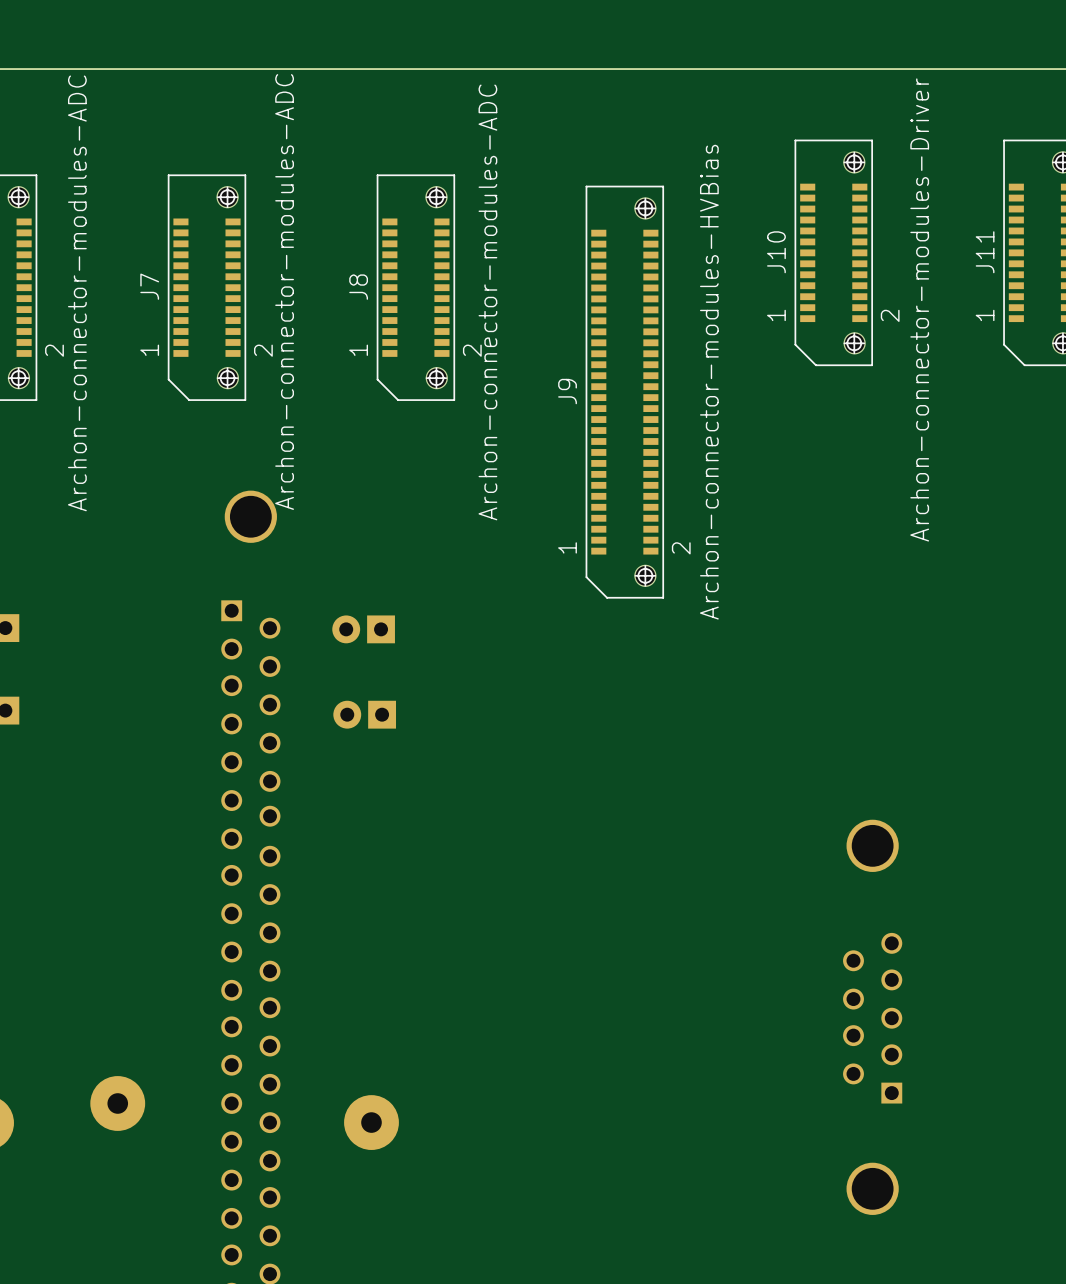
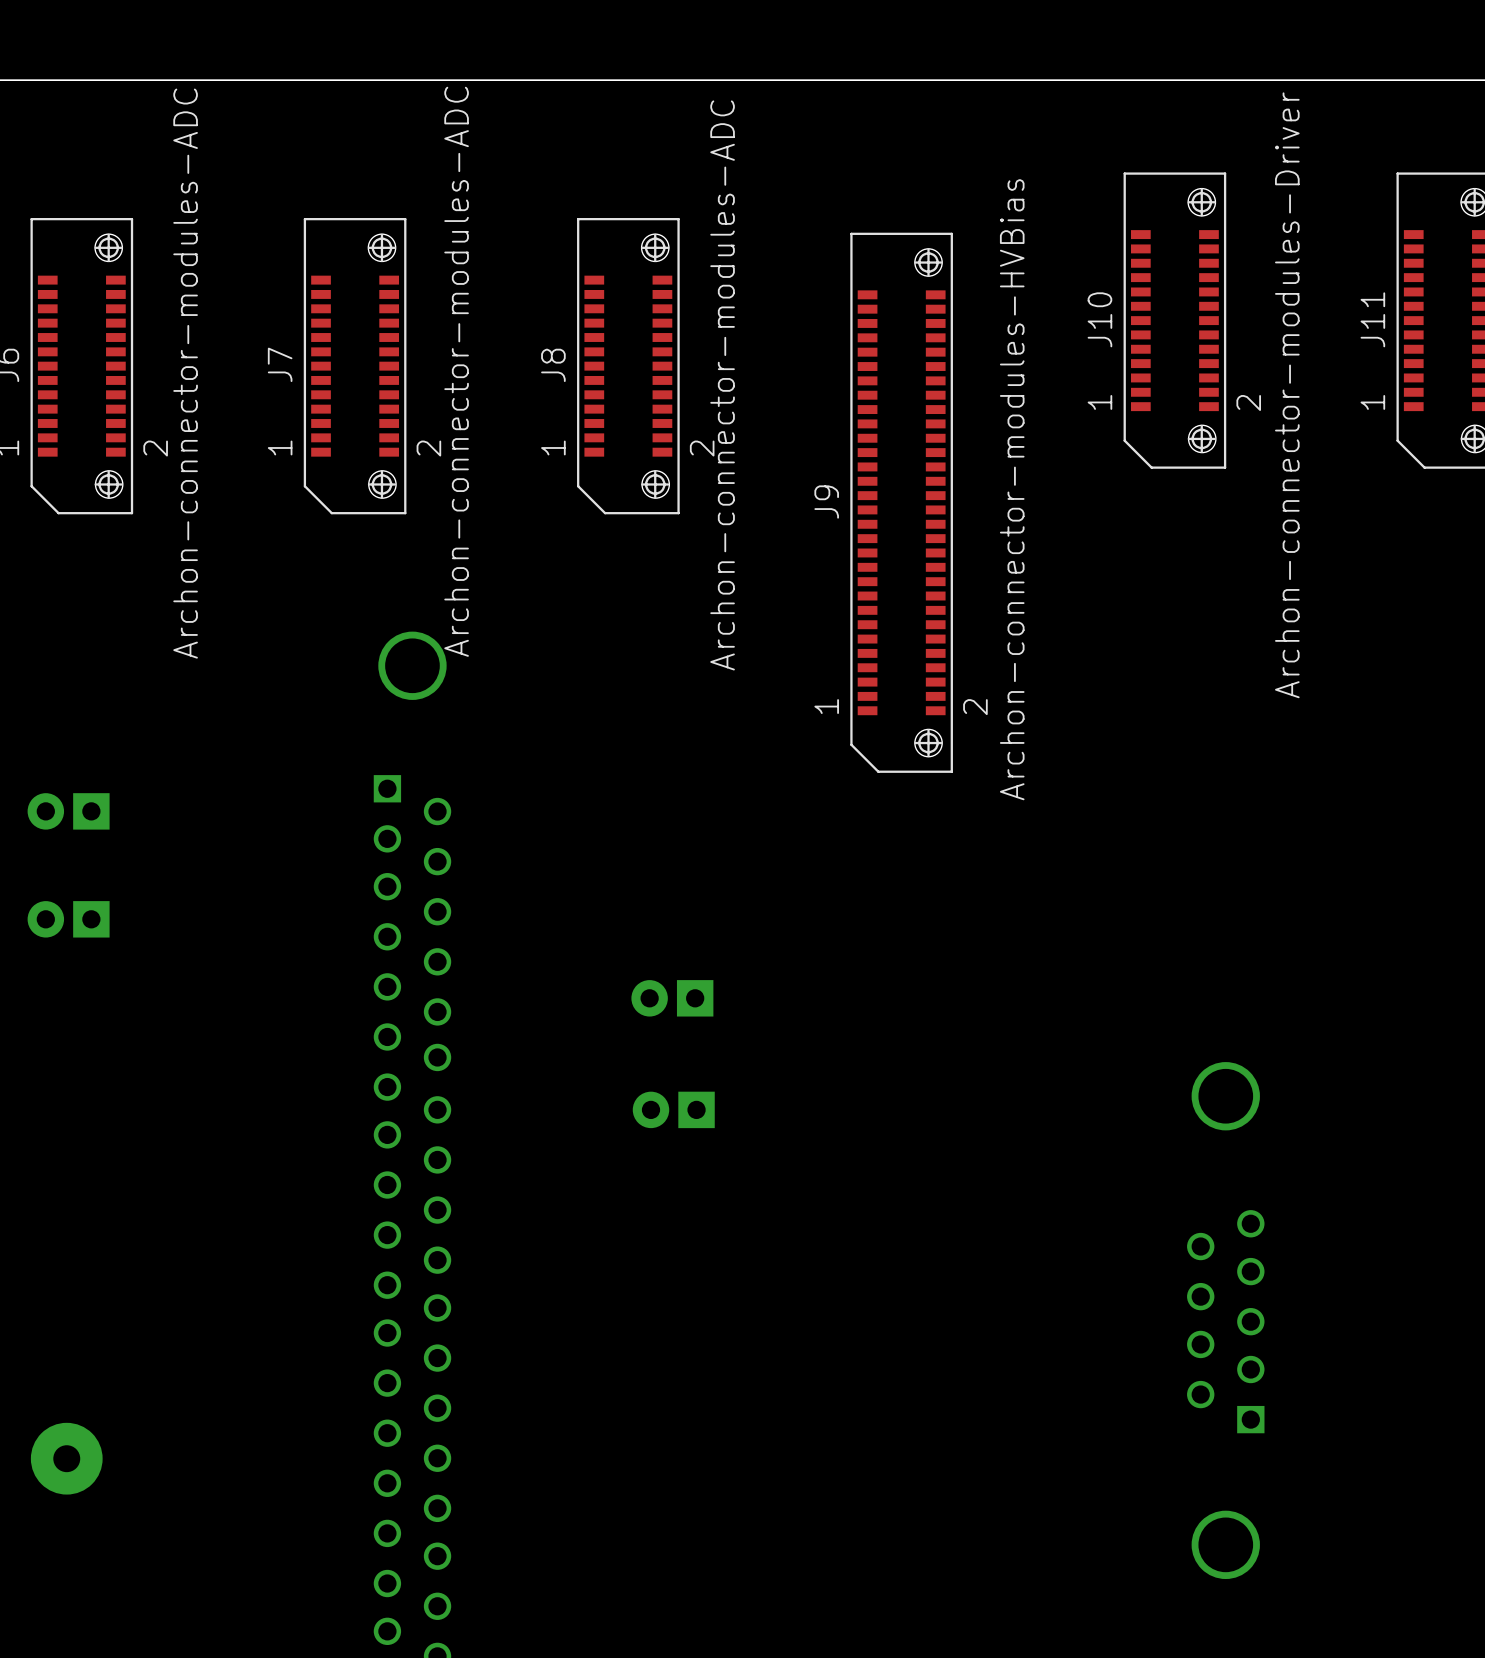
part: (363, 629) -> none
part: (364, 714) -> none
part: none -> (672, 998)
part: none -> (673, 1109)
part: (117, 1103) -> none
part: (371, 1122) -> none

